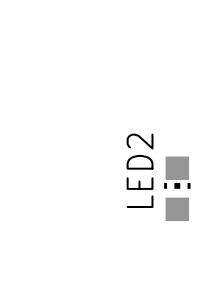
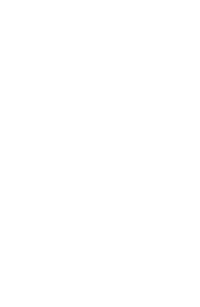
LED2: (177, 188) -> none

